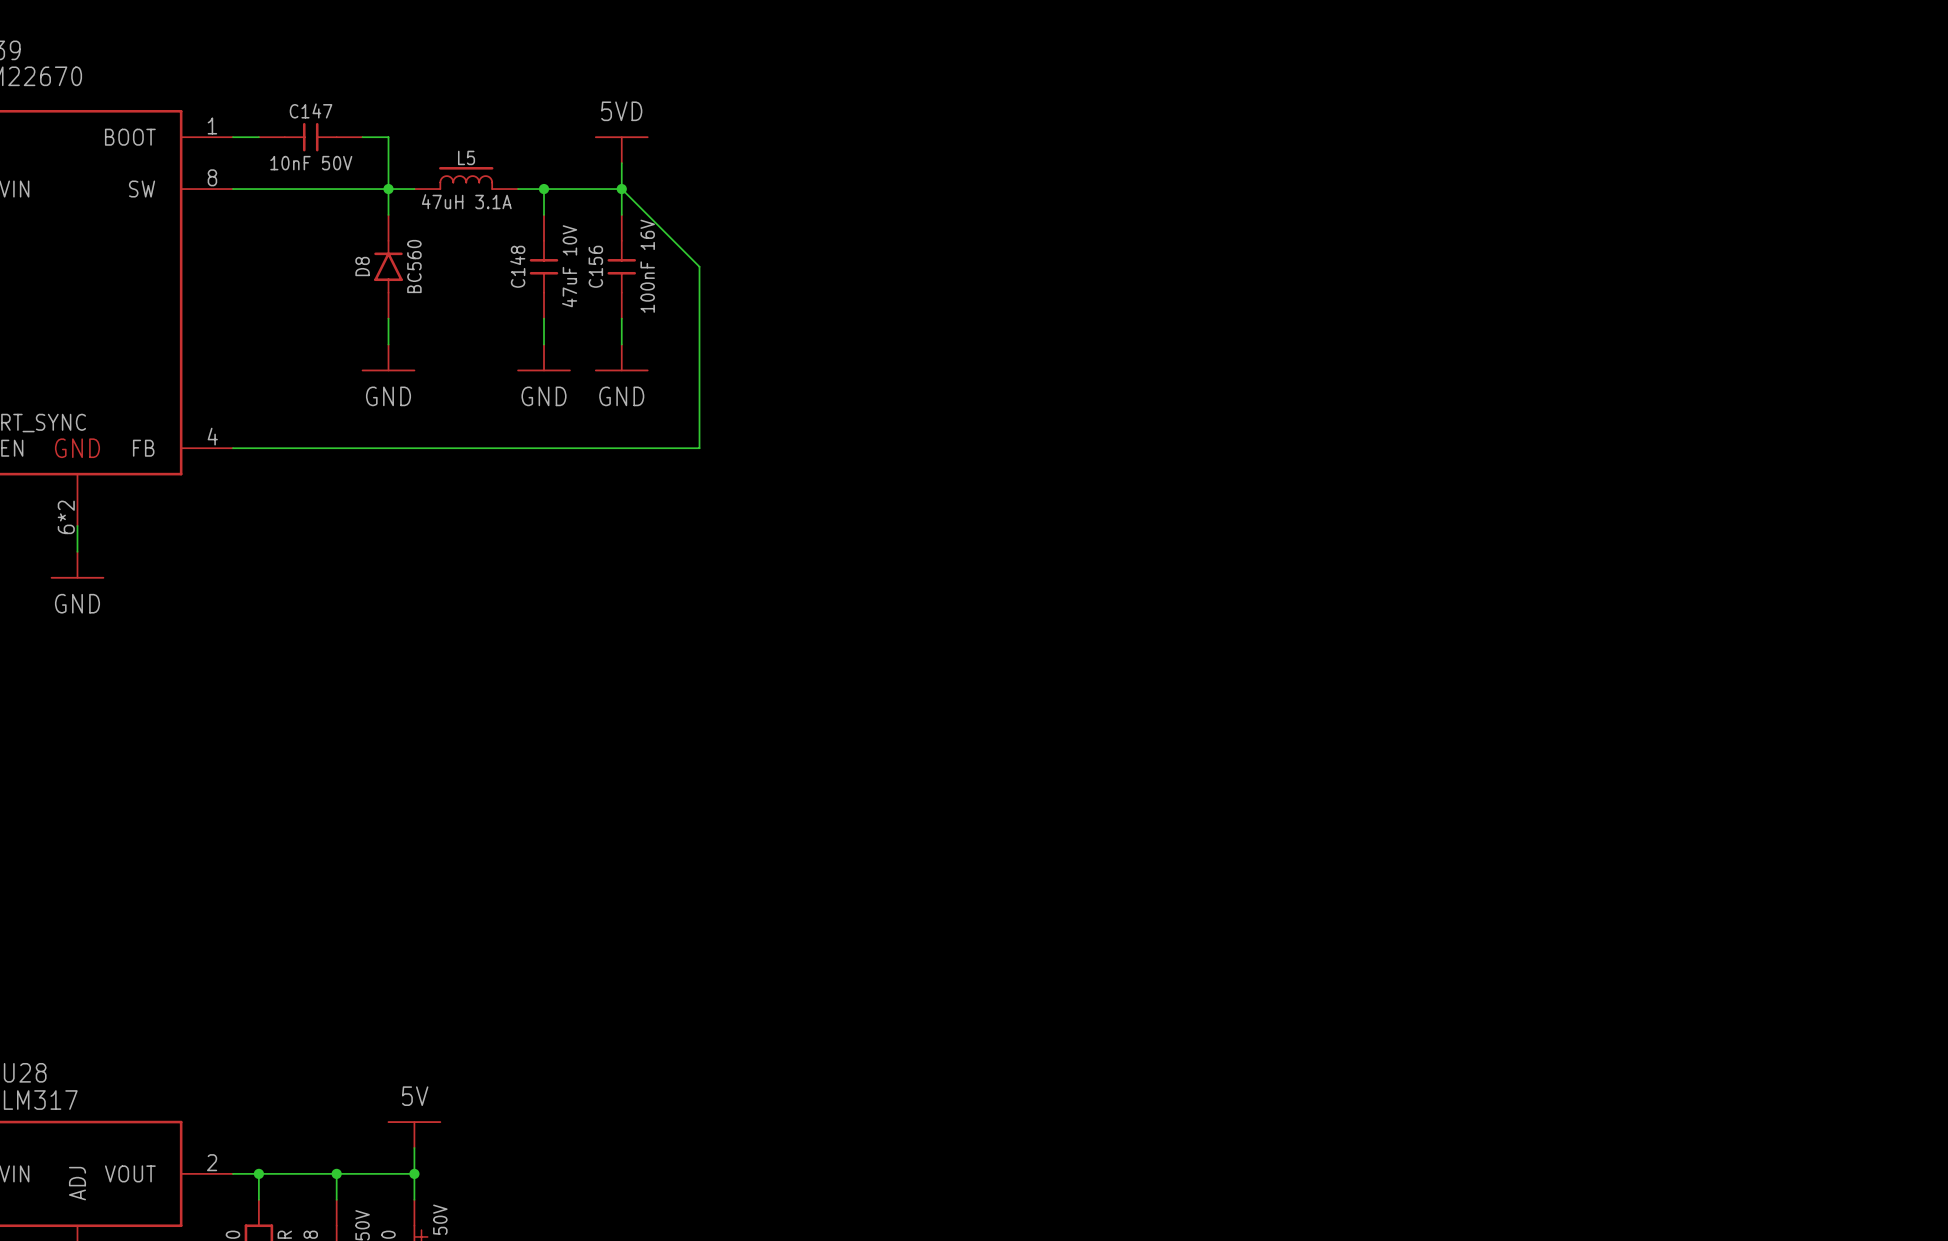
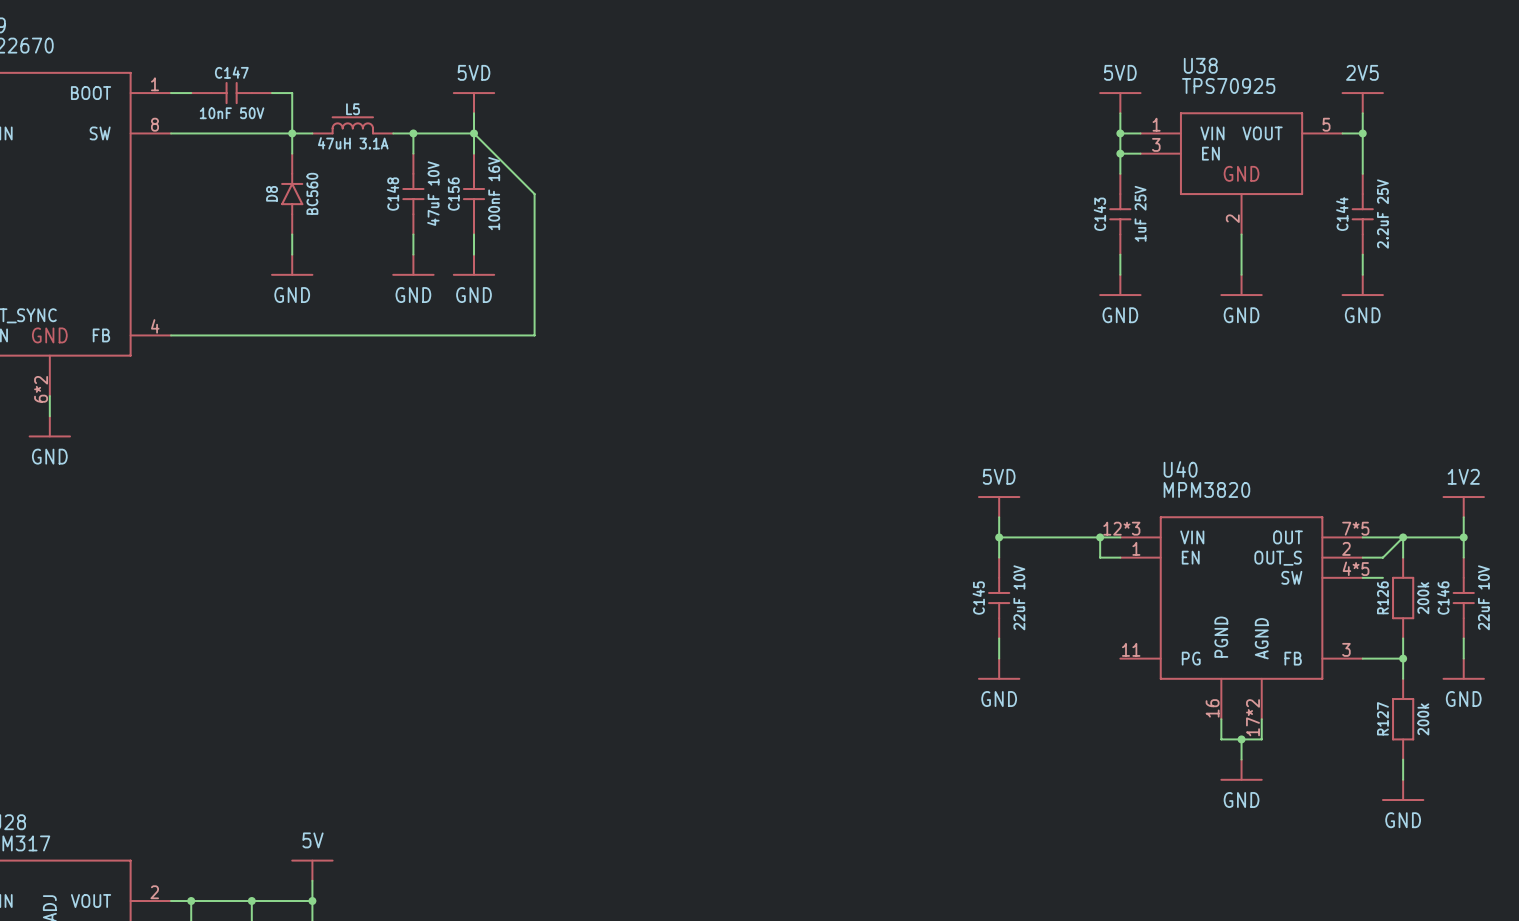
power symbol: none -> 5VD (1120, 102)
power symbol: none -> 2V5 (1362, 102)
wire: none -> (1120, 113) (1120, 173)
wire: none -> (1362, 113) (1362, 173)
wire: none -> (1120, 133) (1140, 133)
junction: none -> (1120, 133)
wire: none -> (1342, 133) (1362, 133)
junction: none -> (1362, 133)
wire: none -> (1120, 153) (1140, 153)
junction: none -> (1120, 153)
U38: none -> TPS70925 (1241, 173)
C143: none -> 1uF 25V (1120, 214)
C144: none -> 2.2uF 25V (1362, 214)
wire: none -> (1241, 234) (1241, 274)
wire: none -> (1120, 254) (1120, 274)
wire: none -> (1362, 254) (1362, 274)
power symbol: none -> GND (1120, 285)
power symbol: none -> GND (1241, 285)
power symbol: none -> GND (1362, 285)
power symbol: none -> 5VD (999, 506)
power symbol: none -> 1V2 (1463, 506)
wire: none -> (999, 517) (999, 557)
wire: none -> (1463, 517) (1463, 557)
wire: none -> (999, 537) (1120, 537)
junction: none -> (999, 537)
wire: none -> (1100, 537) (1100, 557) (1120, 557)
junction: none -> (1100, 537)
wire: none -> (1362, 537) (1463, 537)
junction: none -> (1403, 537)
junction: none -> (1463, 537)
wire: none -> (1362, 557) (1382, 557) (1403, 537) (1403, 557)
wire: none -> (1362, 577) (1382, 577)
C145: none -> 22uF 10V (999, 598)
R126: none -> 200k (1403, 598)
C146: none -> 22uF 10V (1463, 598)
U40: none -> MPM3820 (1241, 617)
wire: none -> (999, 638) (999, 658)
wire: none -> (1403, 638) (1403, 678)
wire: none -> (1463, 638) (1463, 658)
wire: none -> (1362, 658) (1403, 658)
junction: none -> (1403, 658)
power symbol: none -> GND (999, 669)
power symbol: none -> GND (1463, 669)
wire: none -> (1221, 719) (1221, 739) (1261, 739) (1261, 719)
R127: none -> 200k (1403, 719)
wire: none -> (1241, 739) (1241, 759)
junction: none -> (1241, 739)
wire: none -> (1403, 759) (1403, 779)
power symbol: none -> GND (1241, 770)
power symbol: none -> GND (1403, 790)

